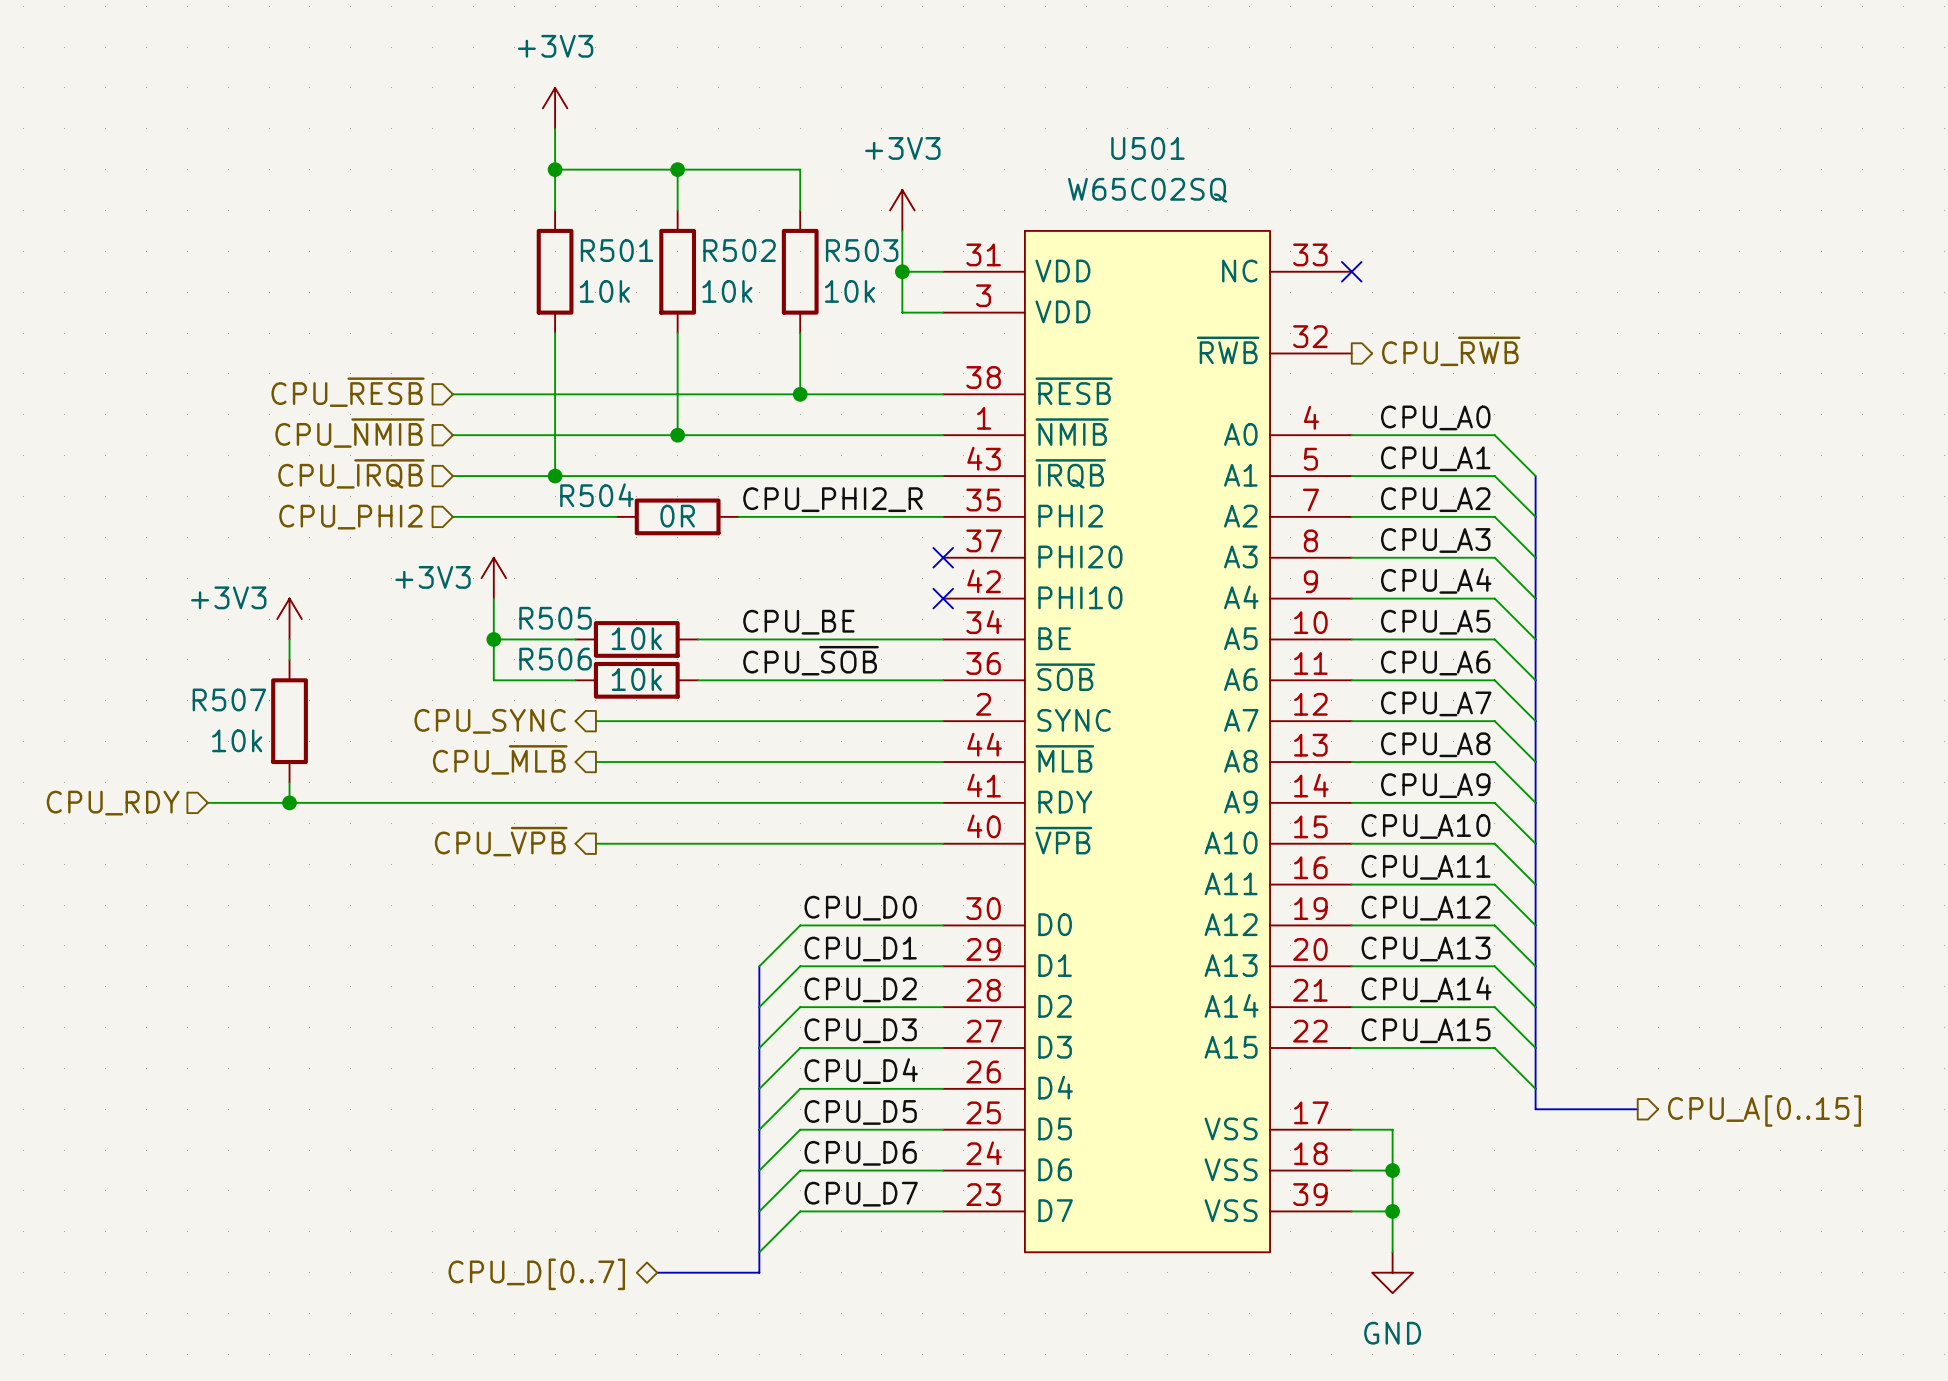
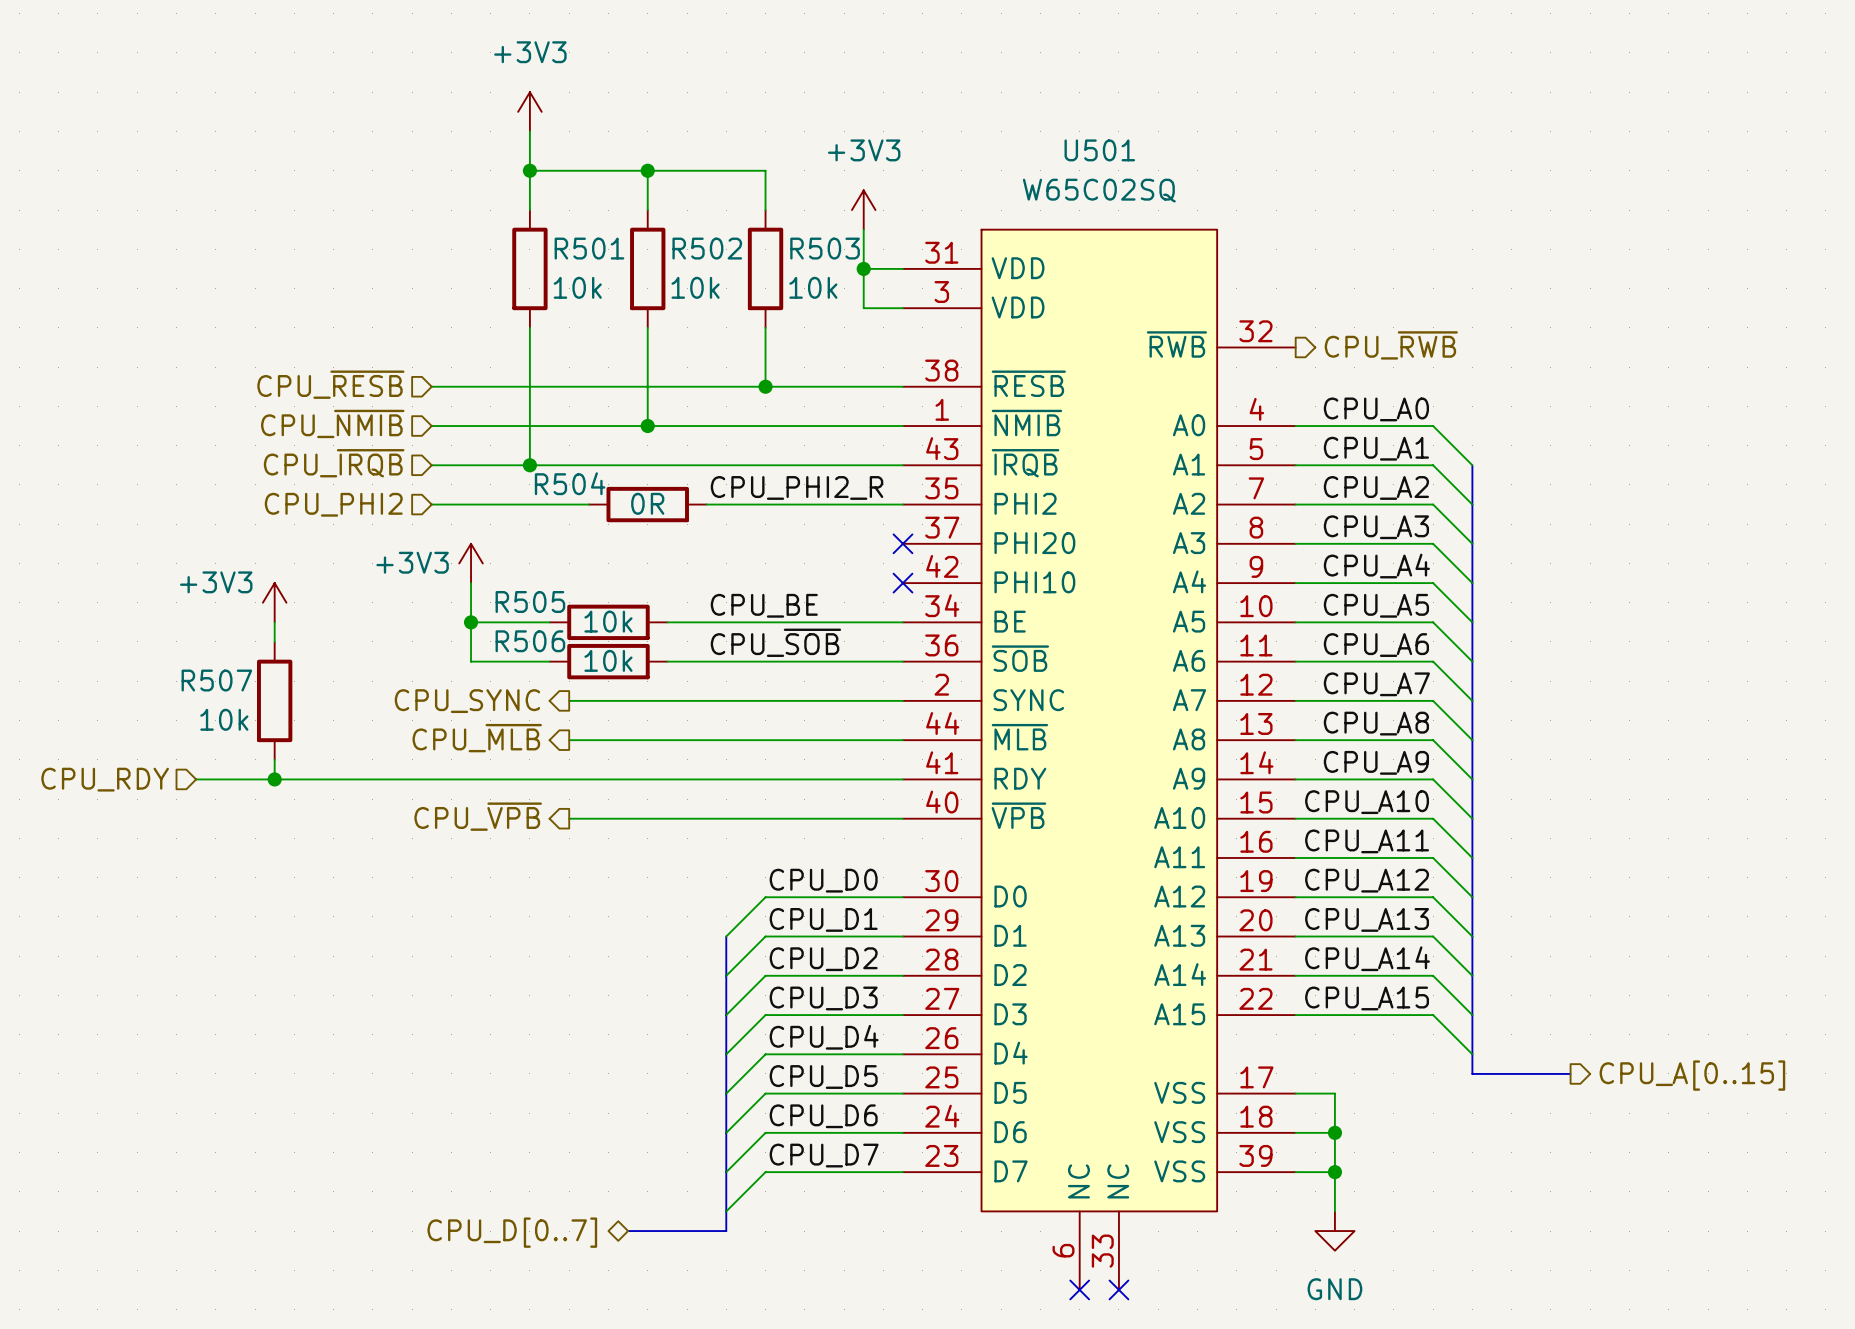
U501 symbol: [943, 230, 1352, 1253] -> [902, 229, 1296, 1290]
no-connect mark: (1351, 271) -> none
no-connect mark: none -> (1079, 1289)
no-connect mark: none -> (1118, 1289)

